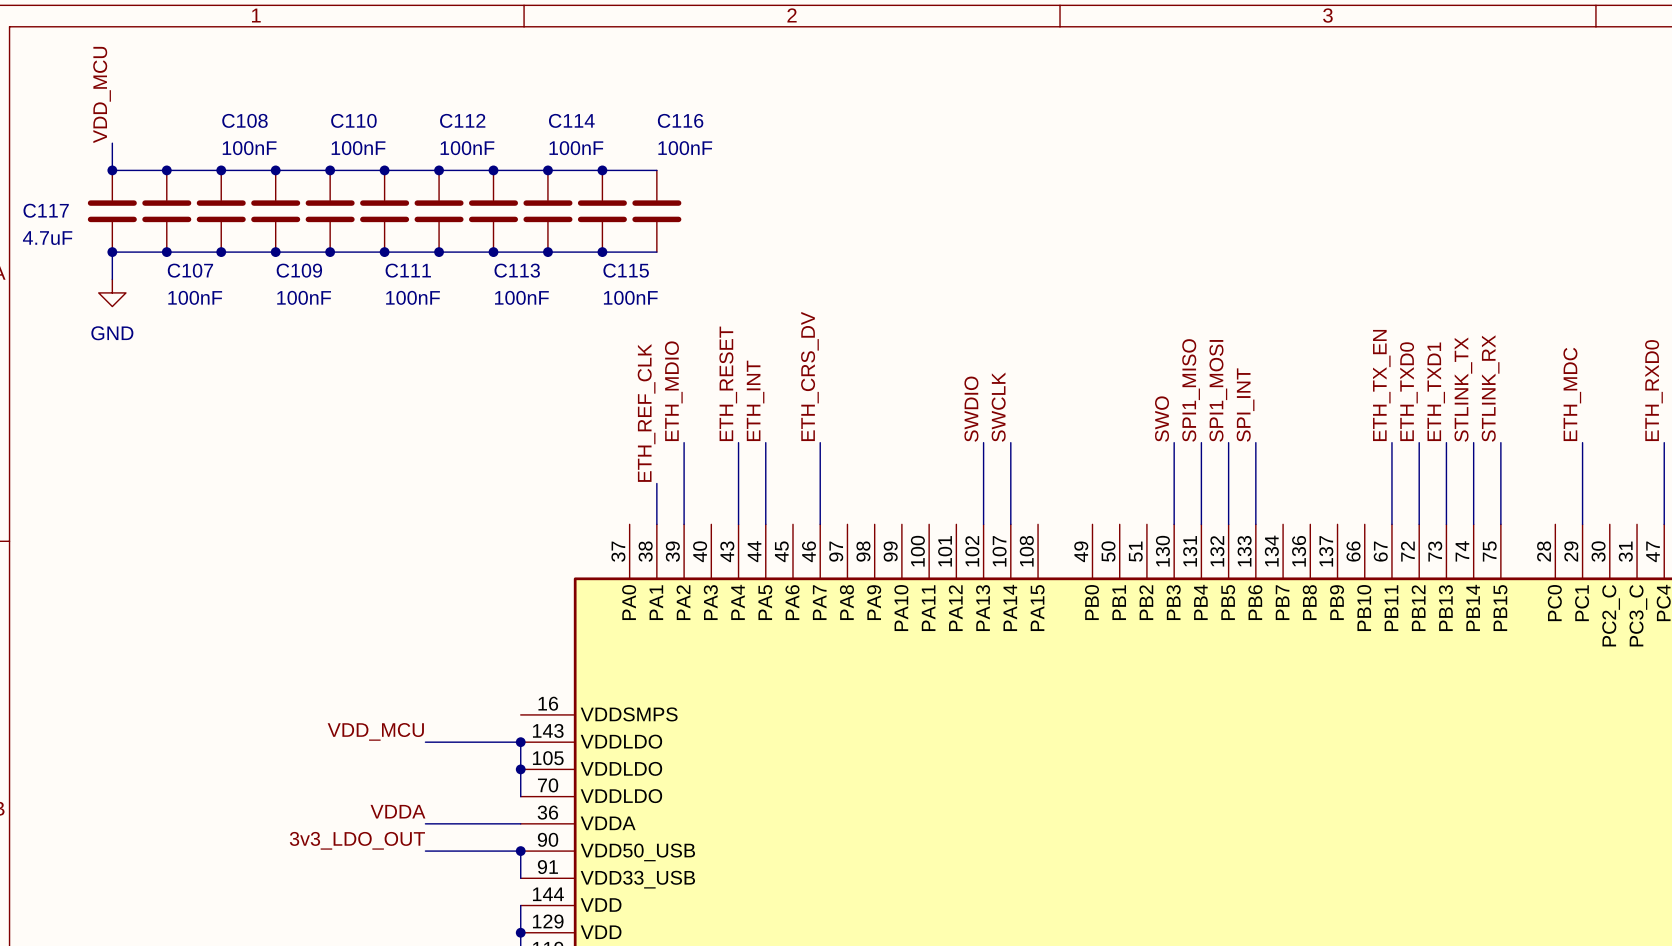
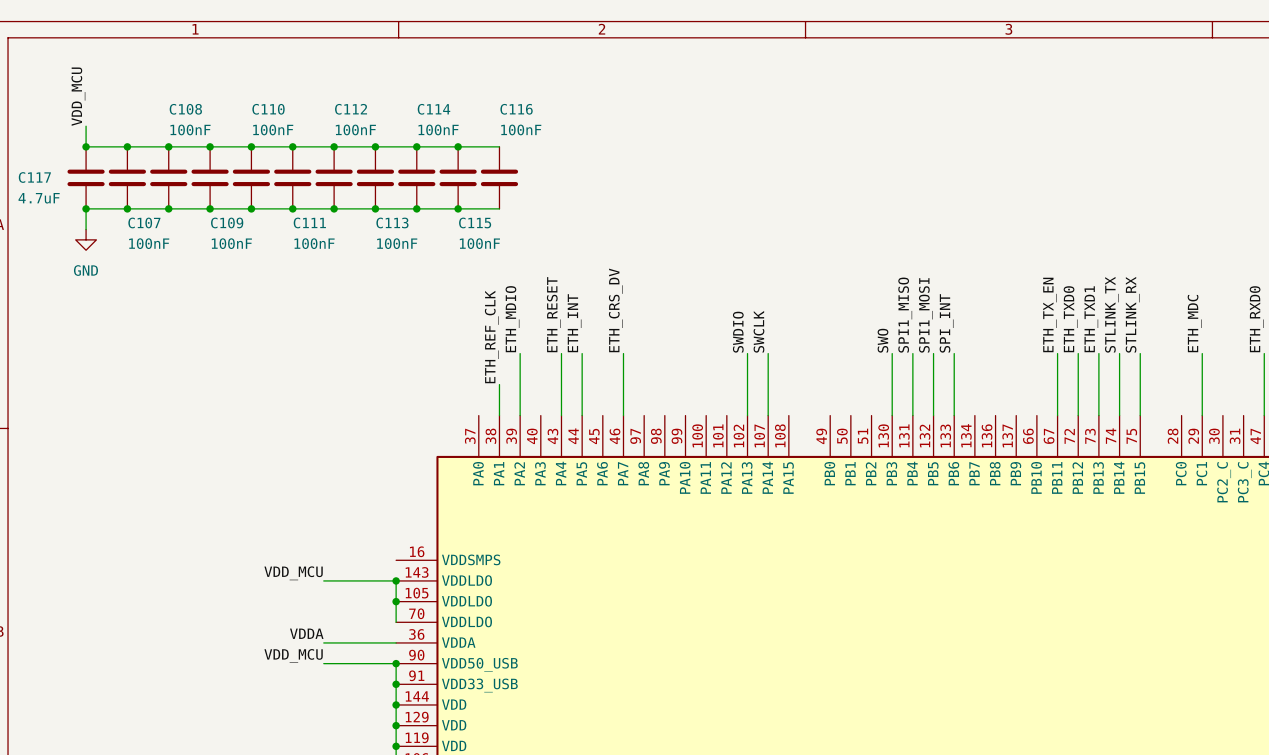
label: 3v3_LDO_OUT (357, 840) -> VDD_MCU (293, 655)
wire: none -> (396, 684) (396, 704)
junction: none -> (396, 684)
junction: none -> (396, 704)

